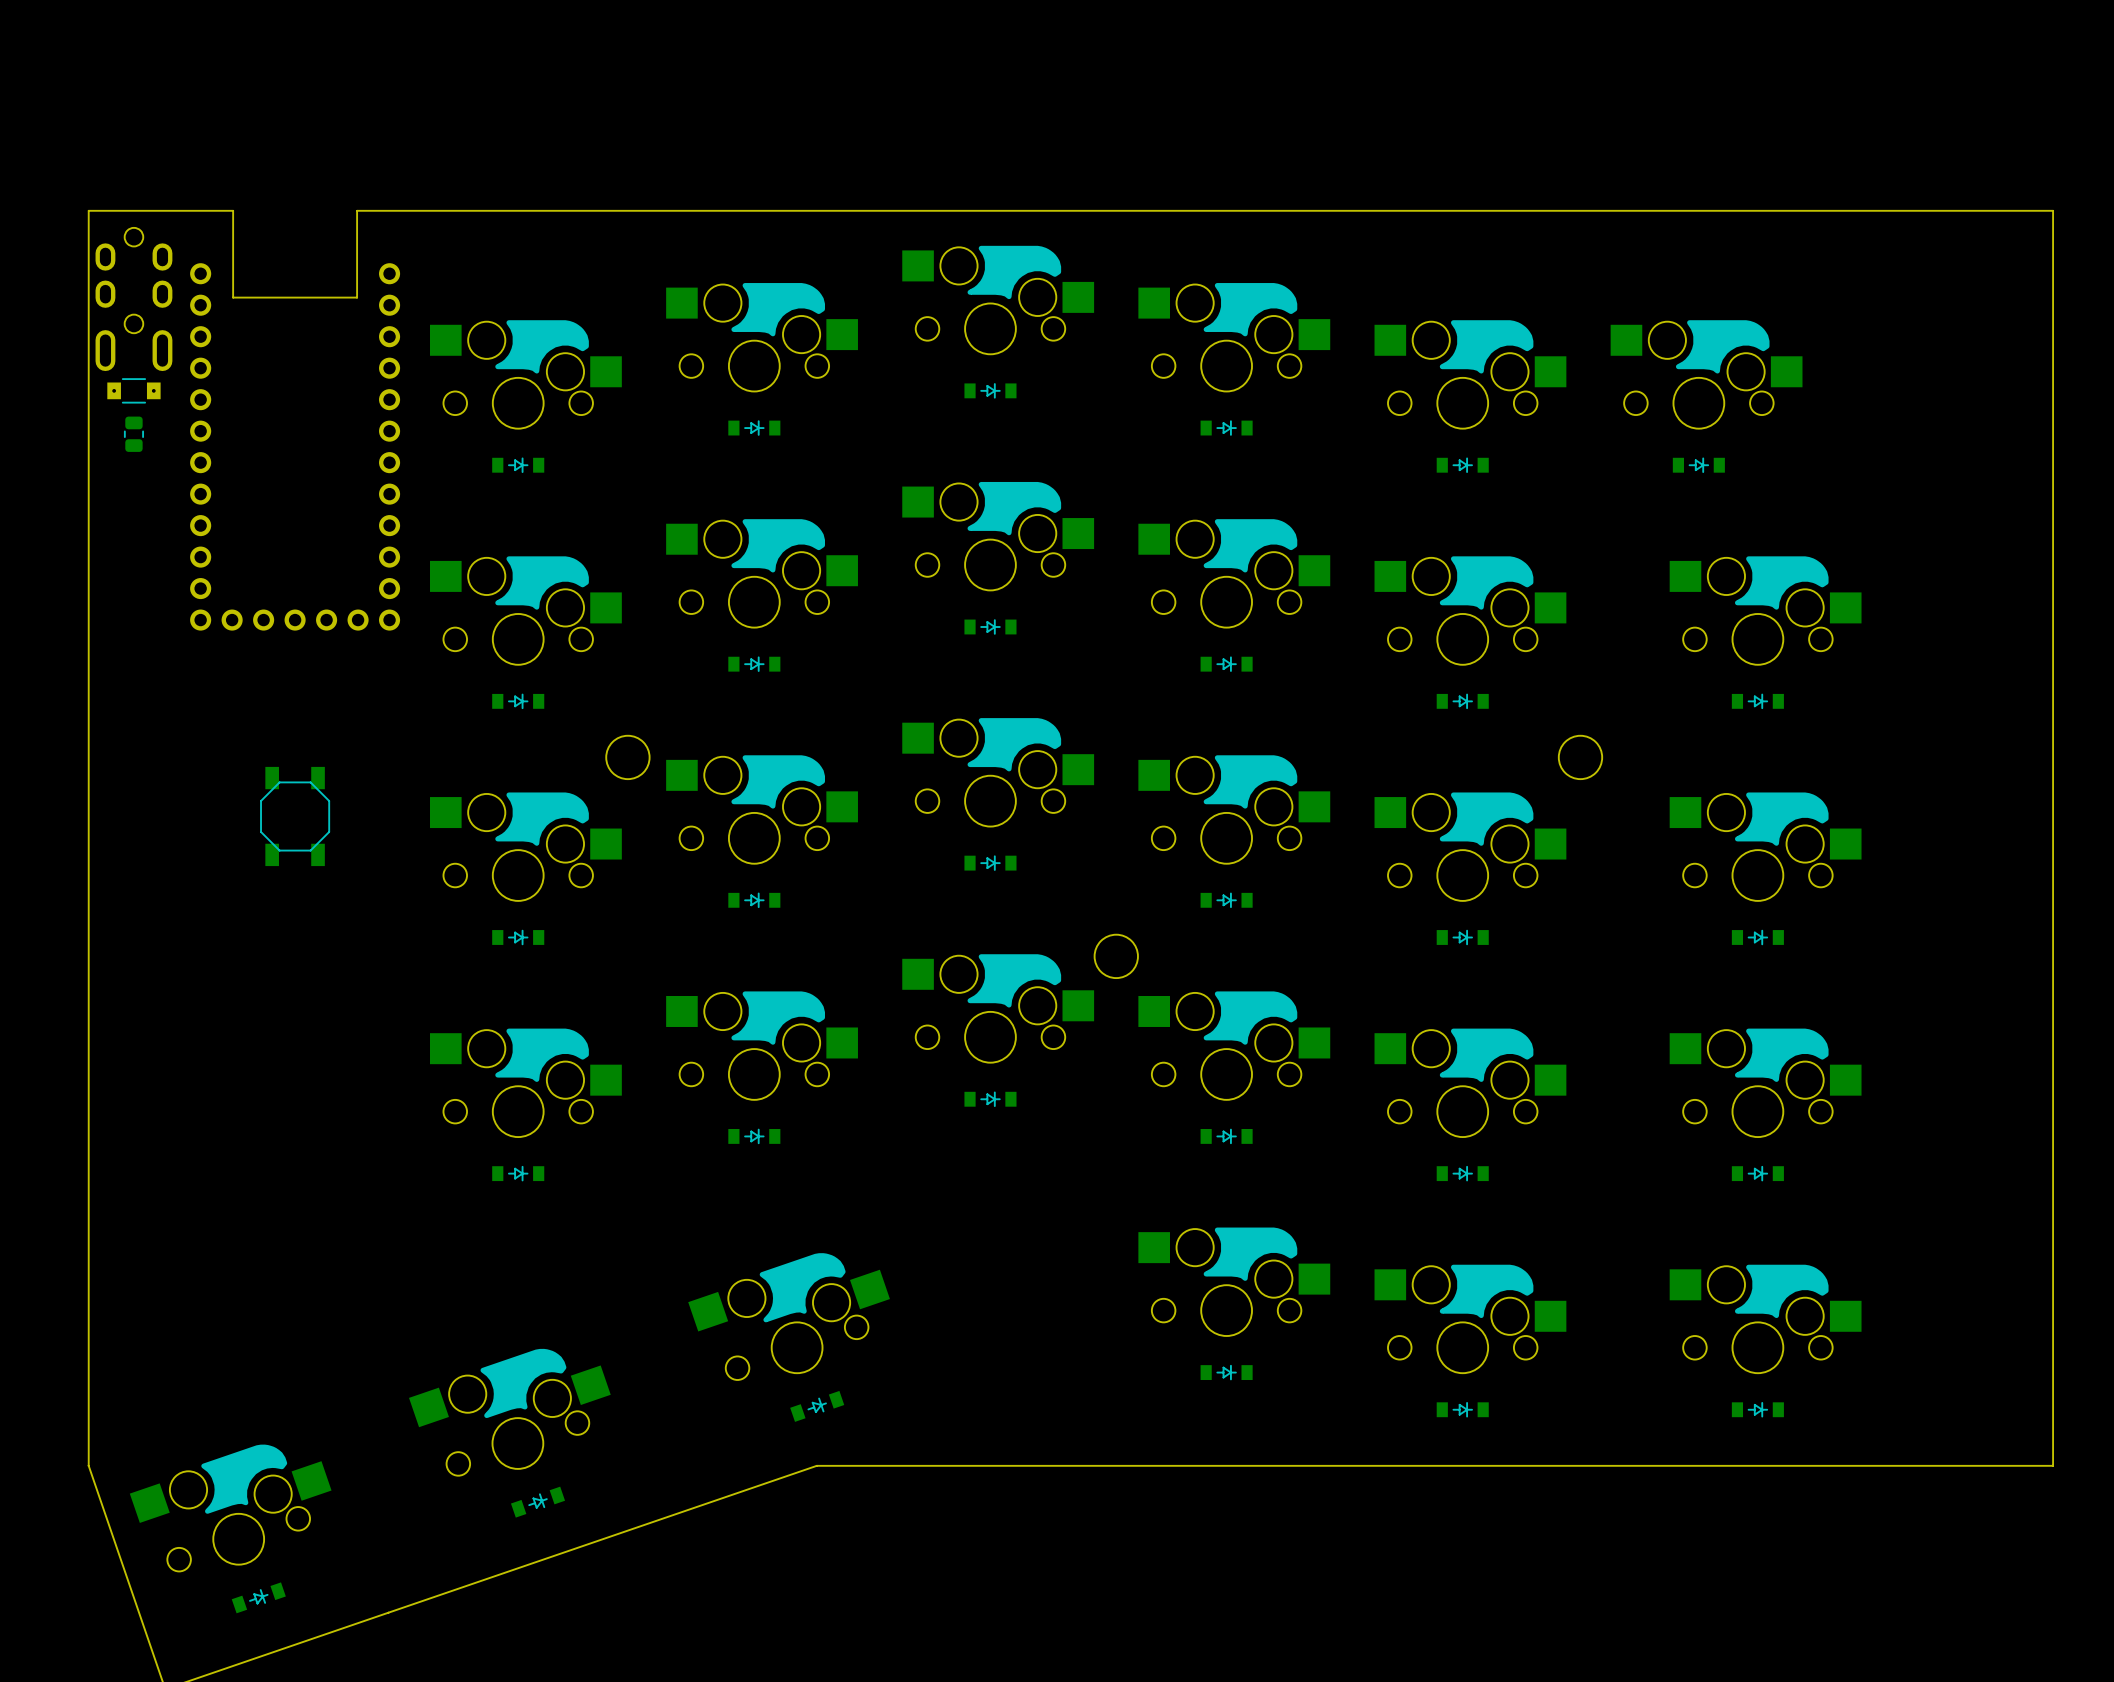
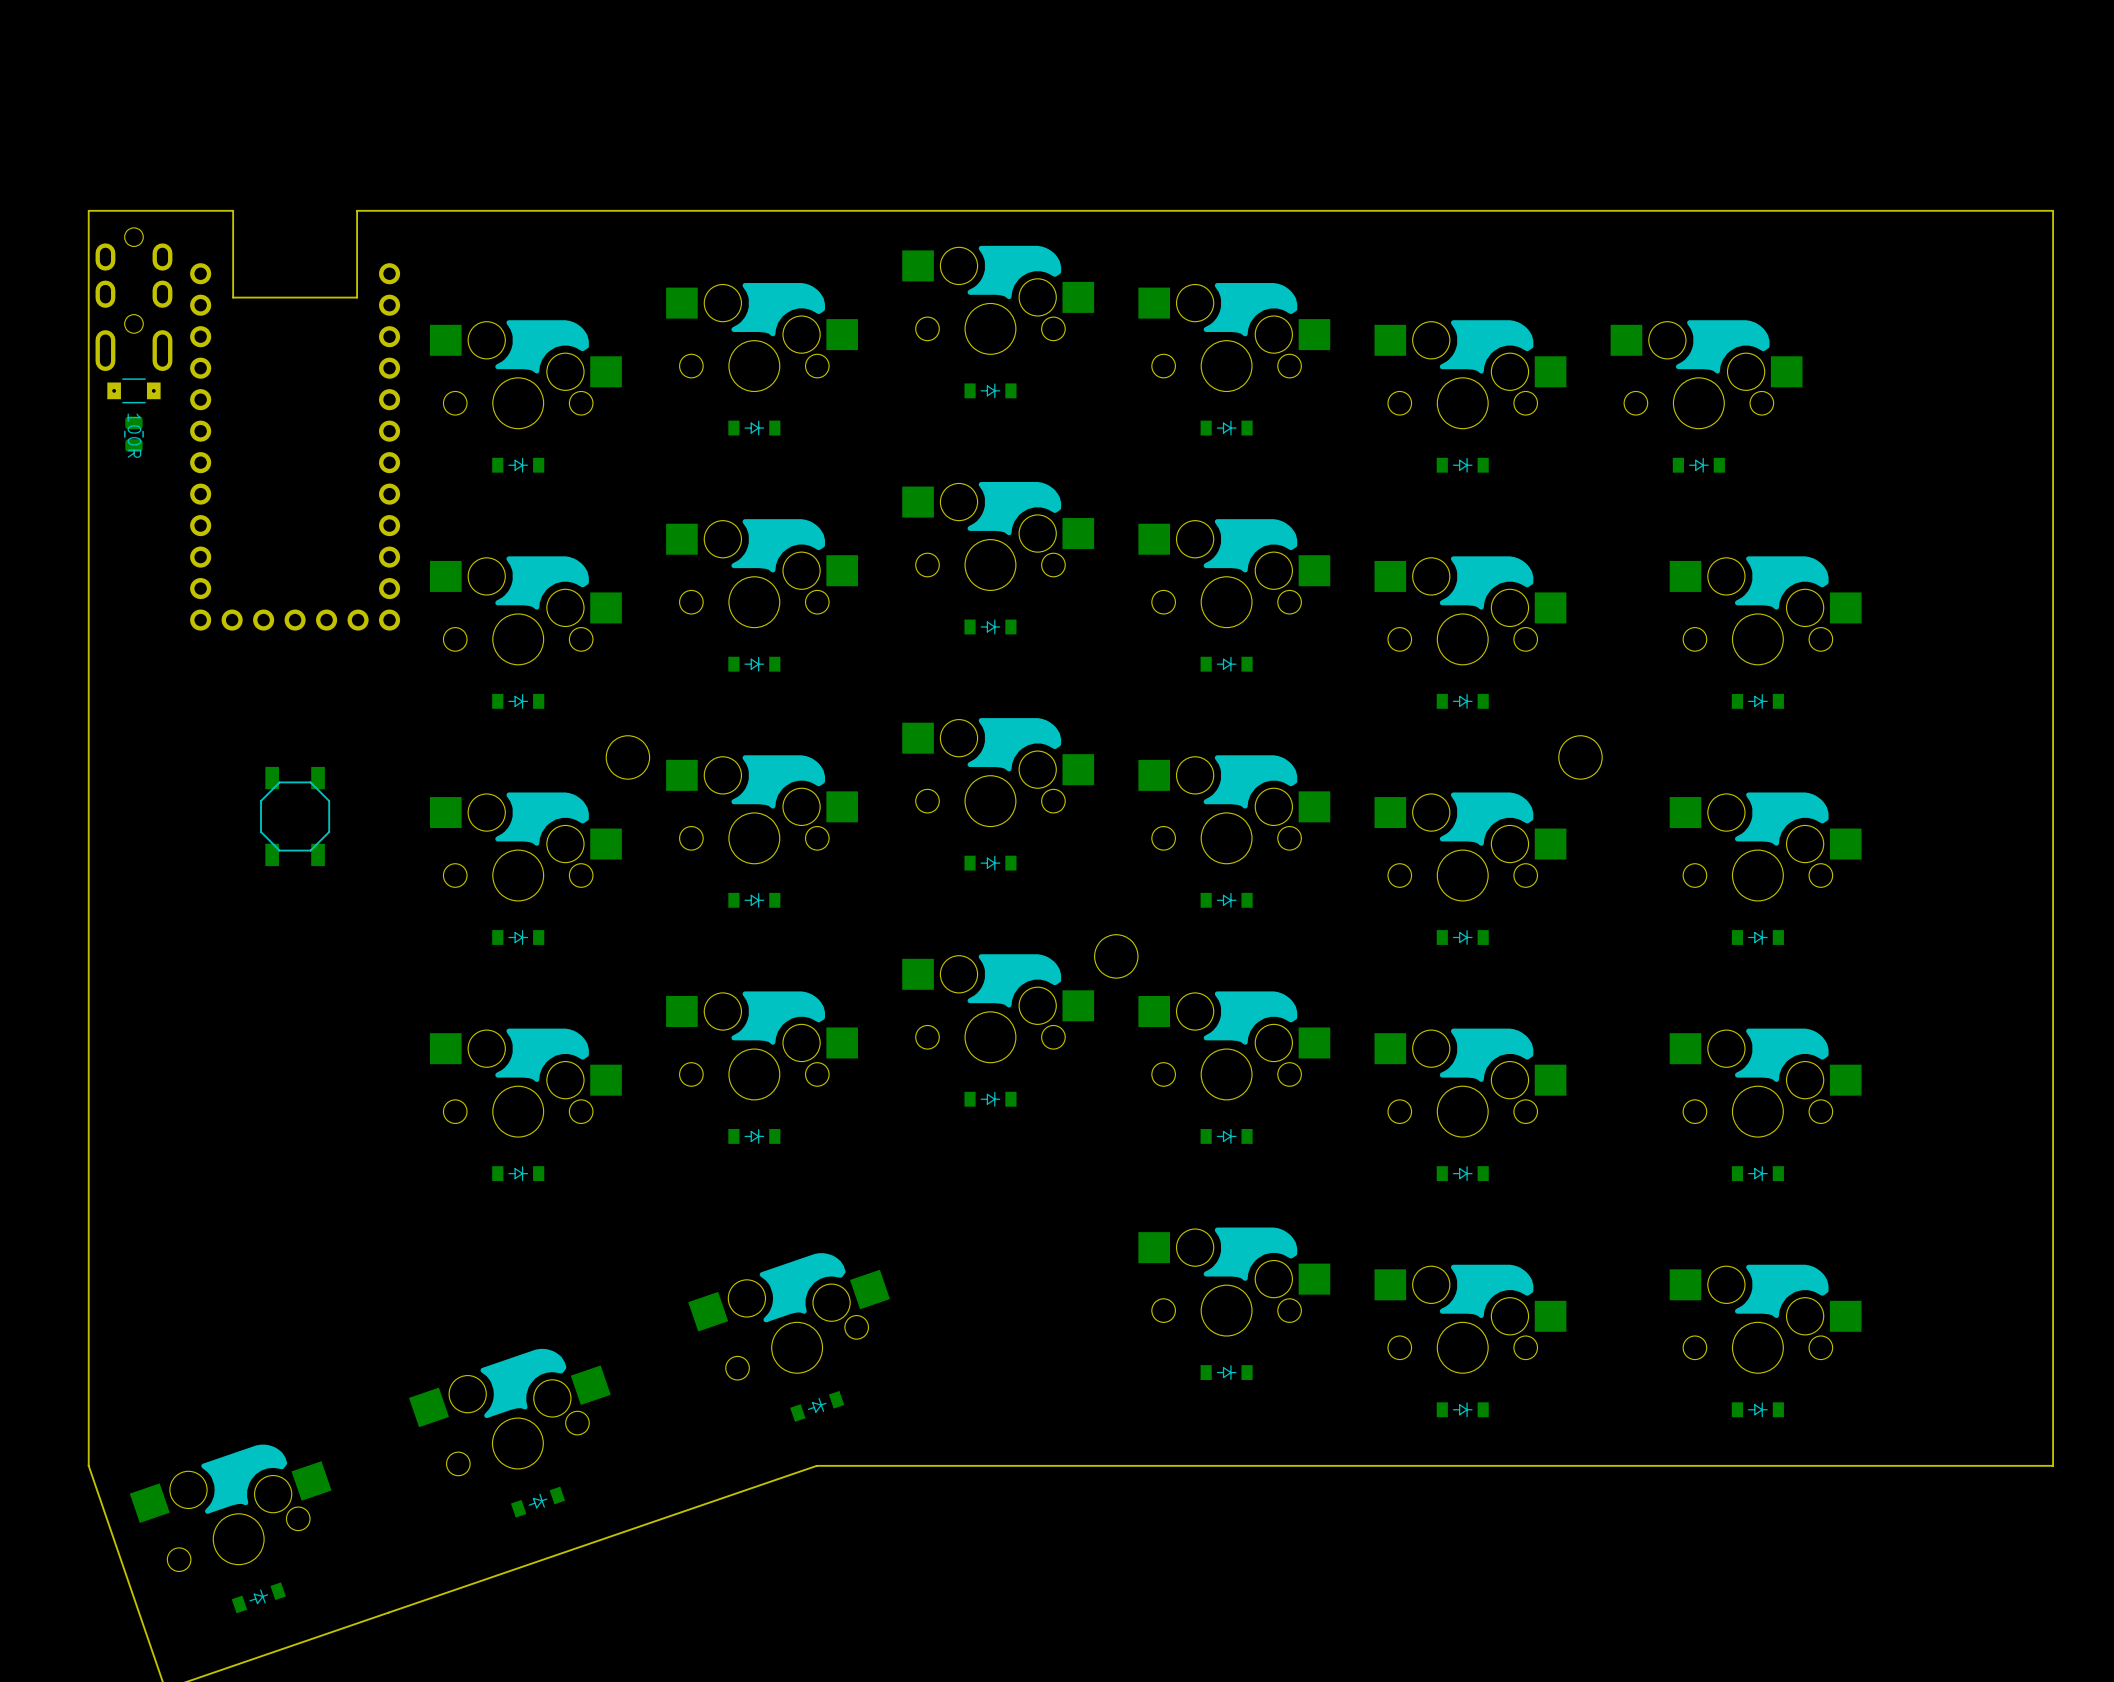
part text: none -> 100R (134, 435)

